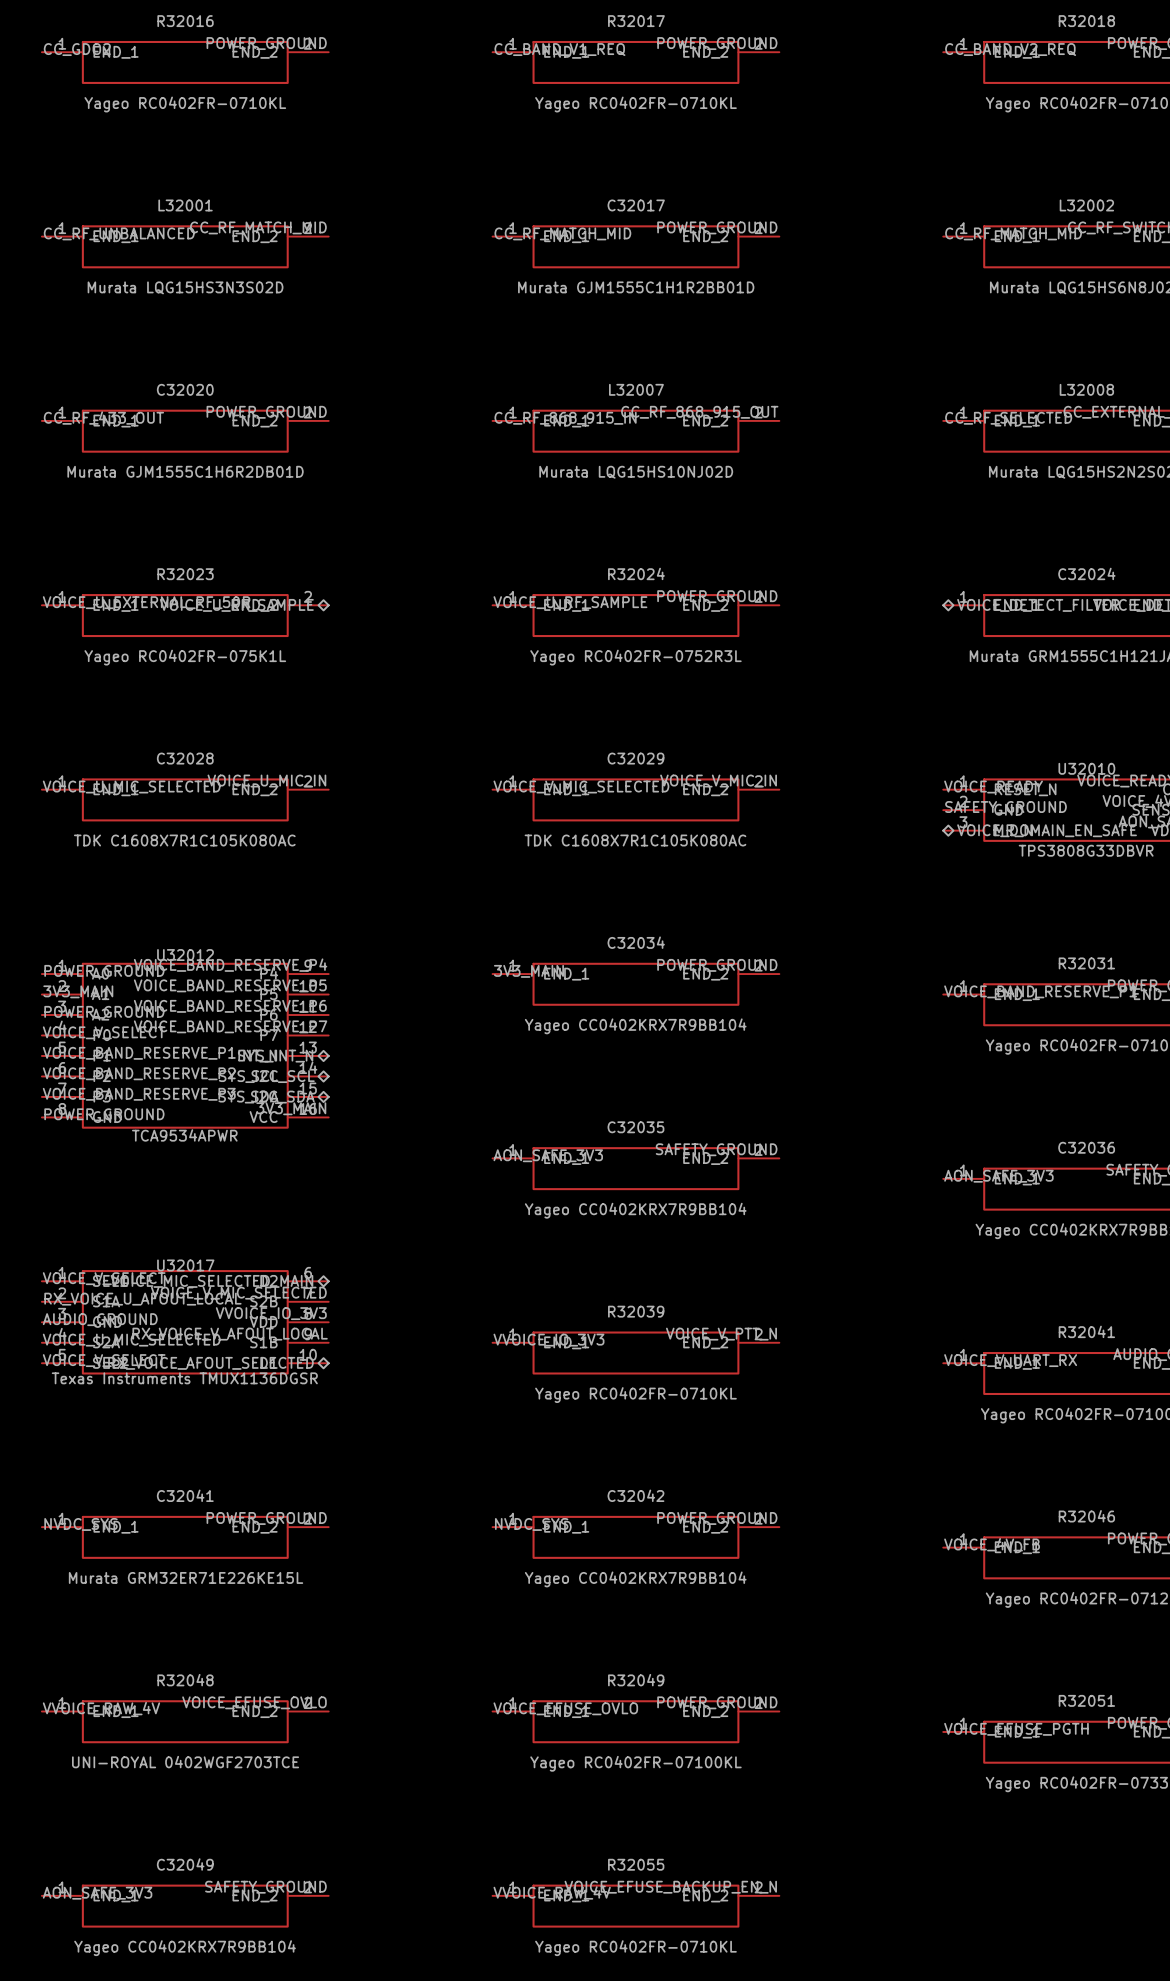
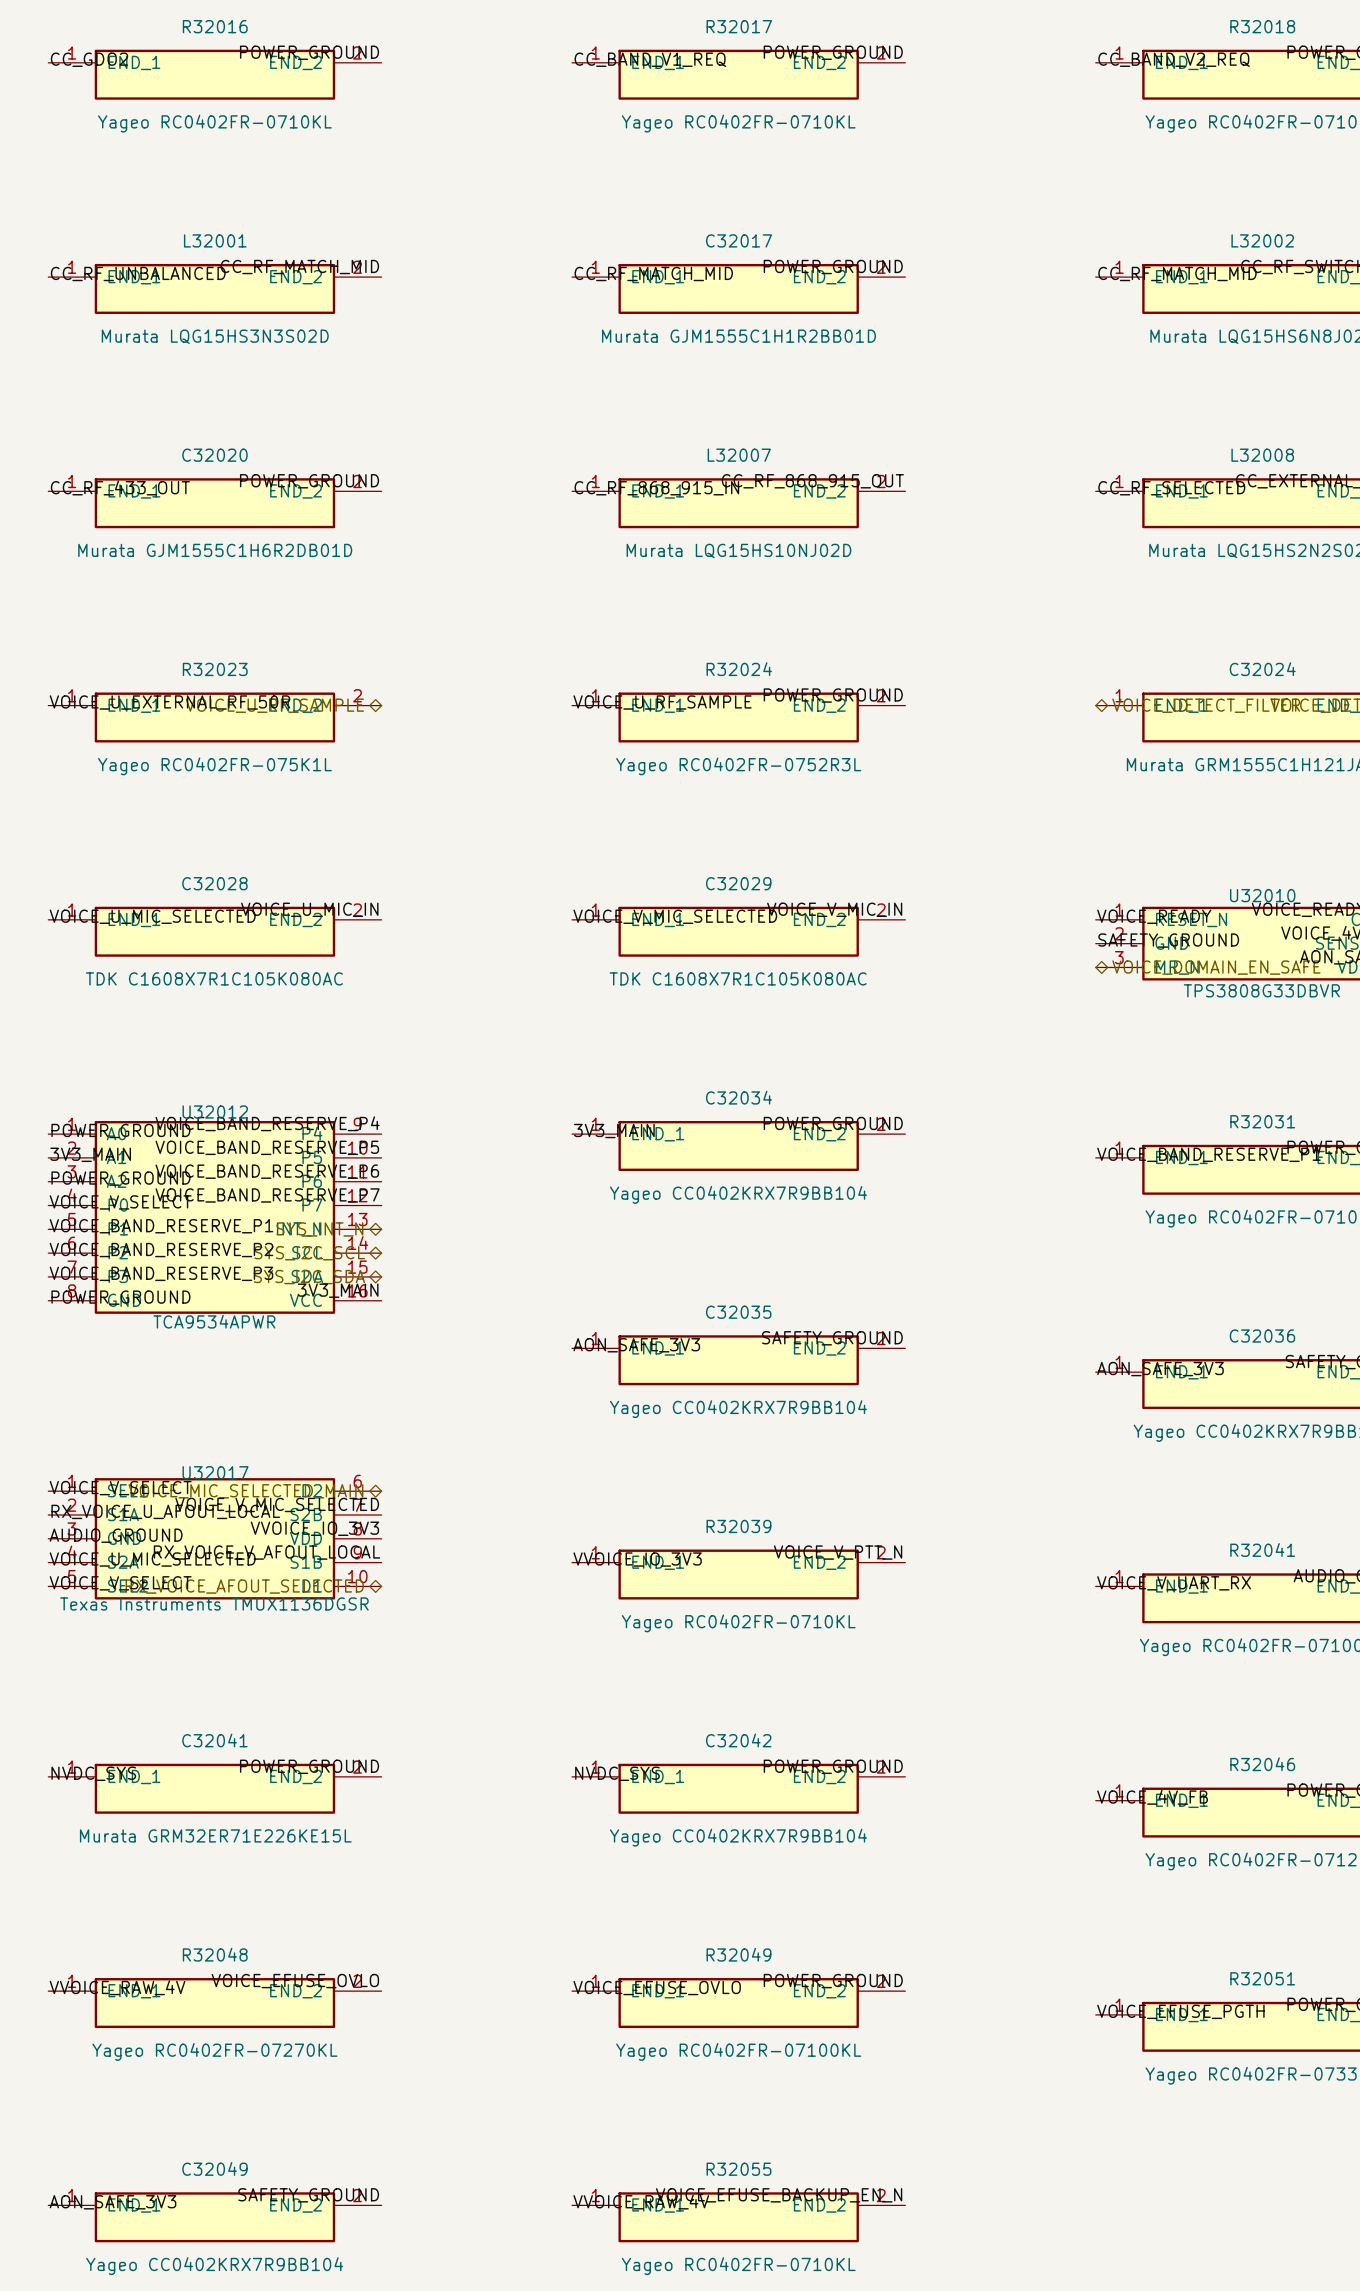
R32048 value: UNI-ROYAL 0402WGF2703TCE (185, 1762) -> Yageo RC0402FR-07270KL (214, 2051)

